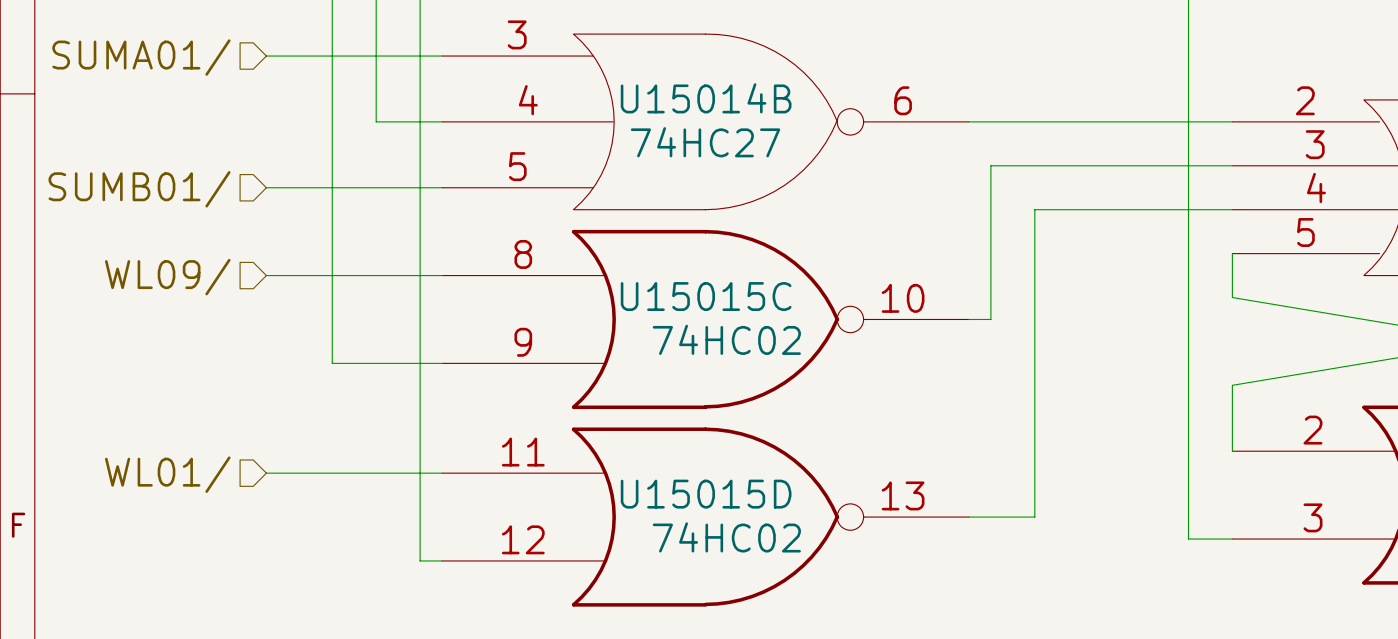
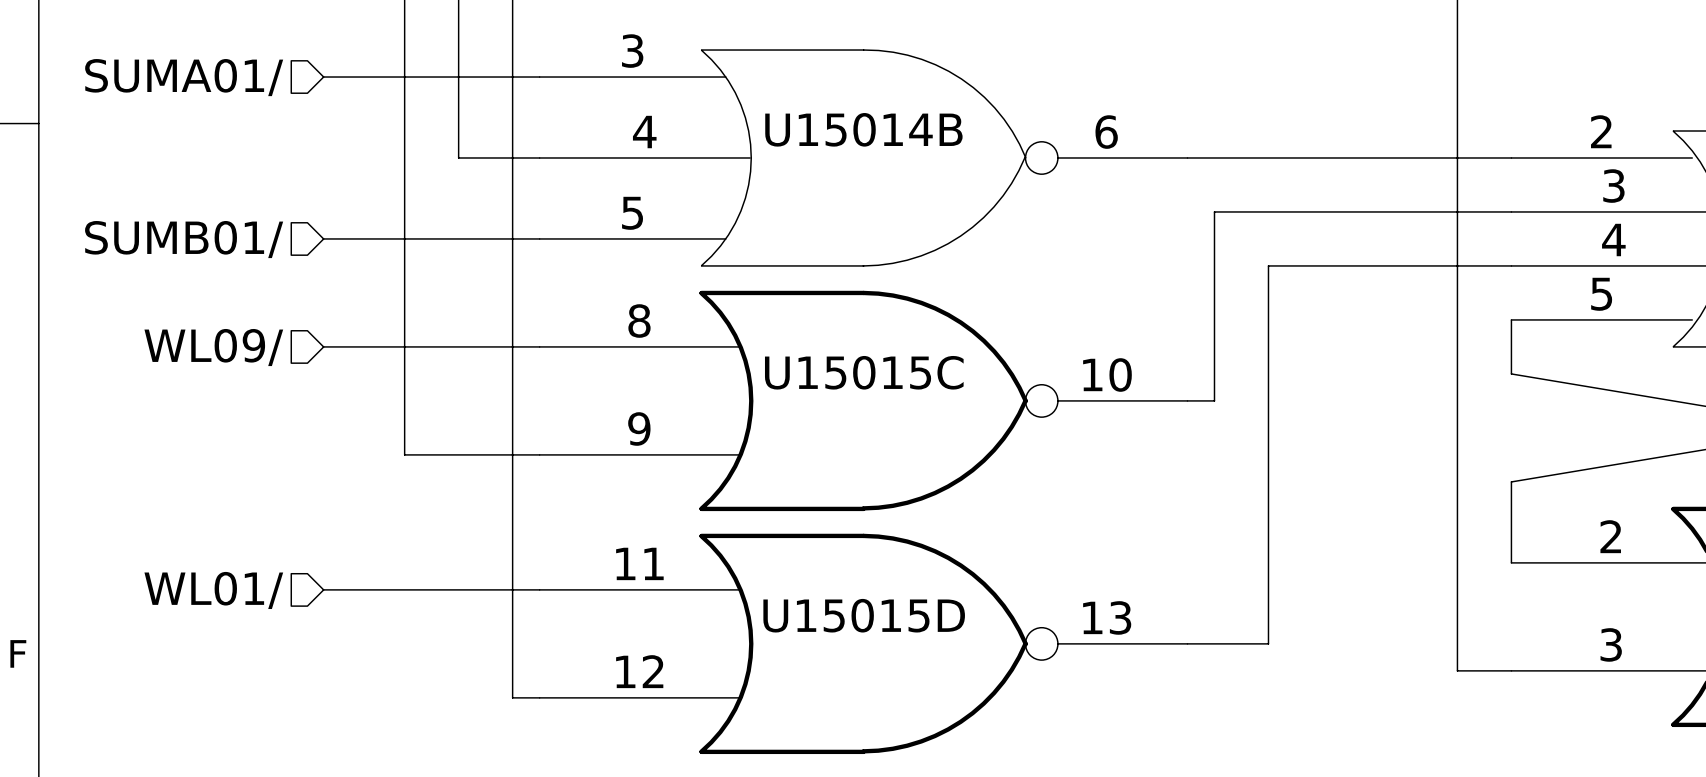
U15014B value: 74HC27 (705, 142) -> none
U15015C value: 74HC02 (726, 339) -> none
U15015D value: 74HC02 (726, 537) -> none

